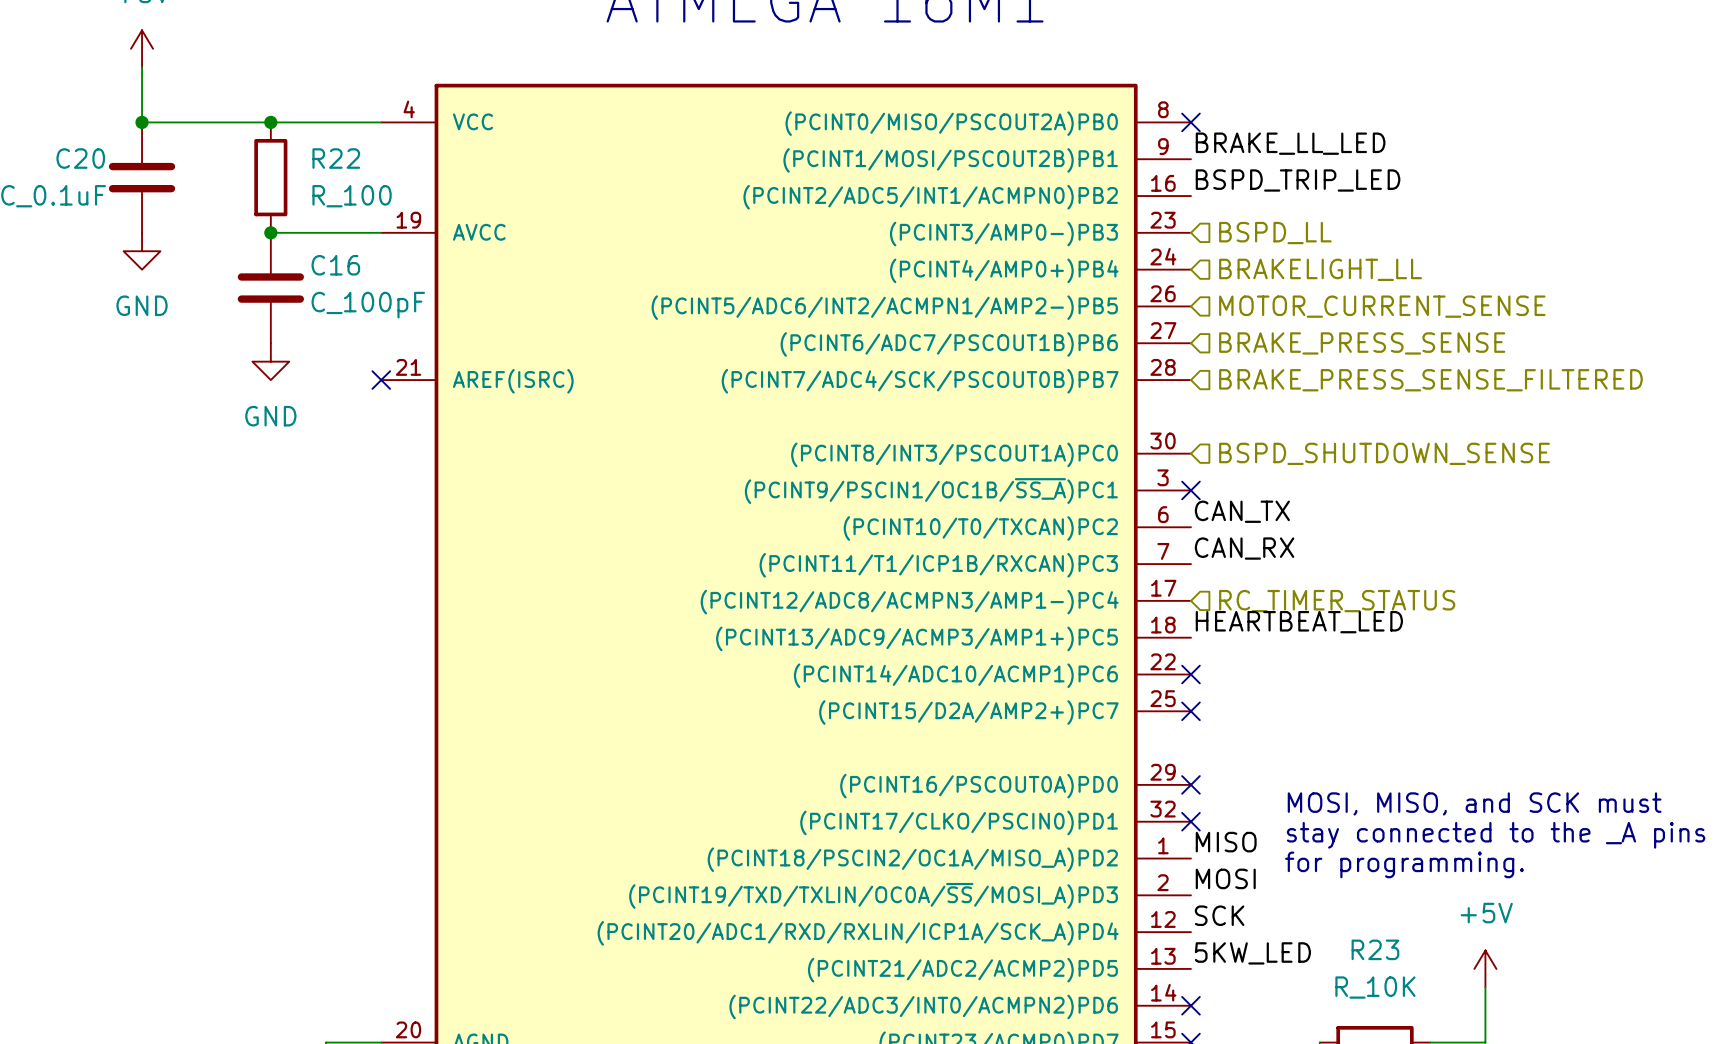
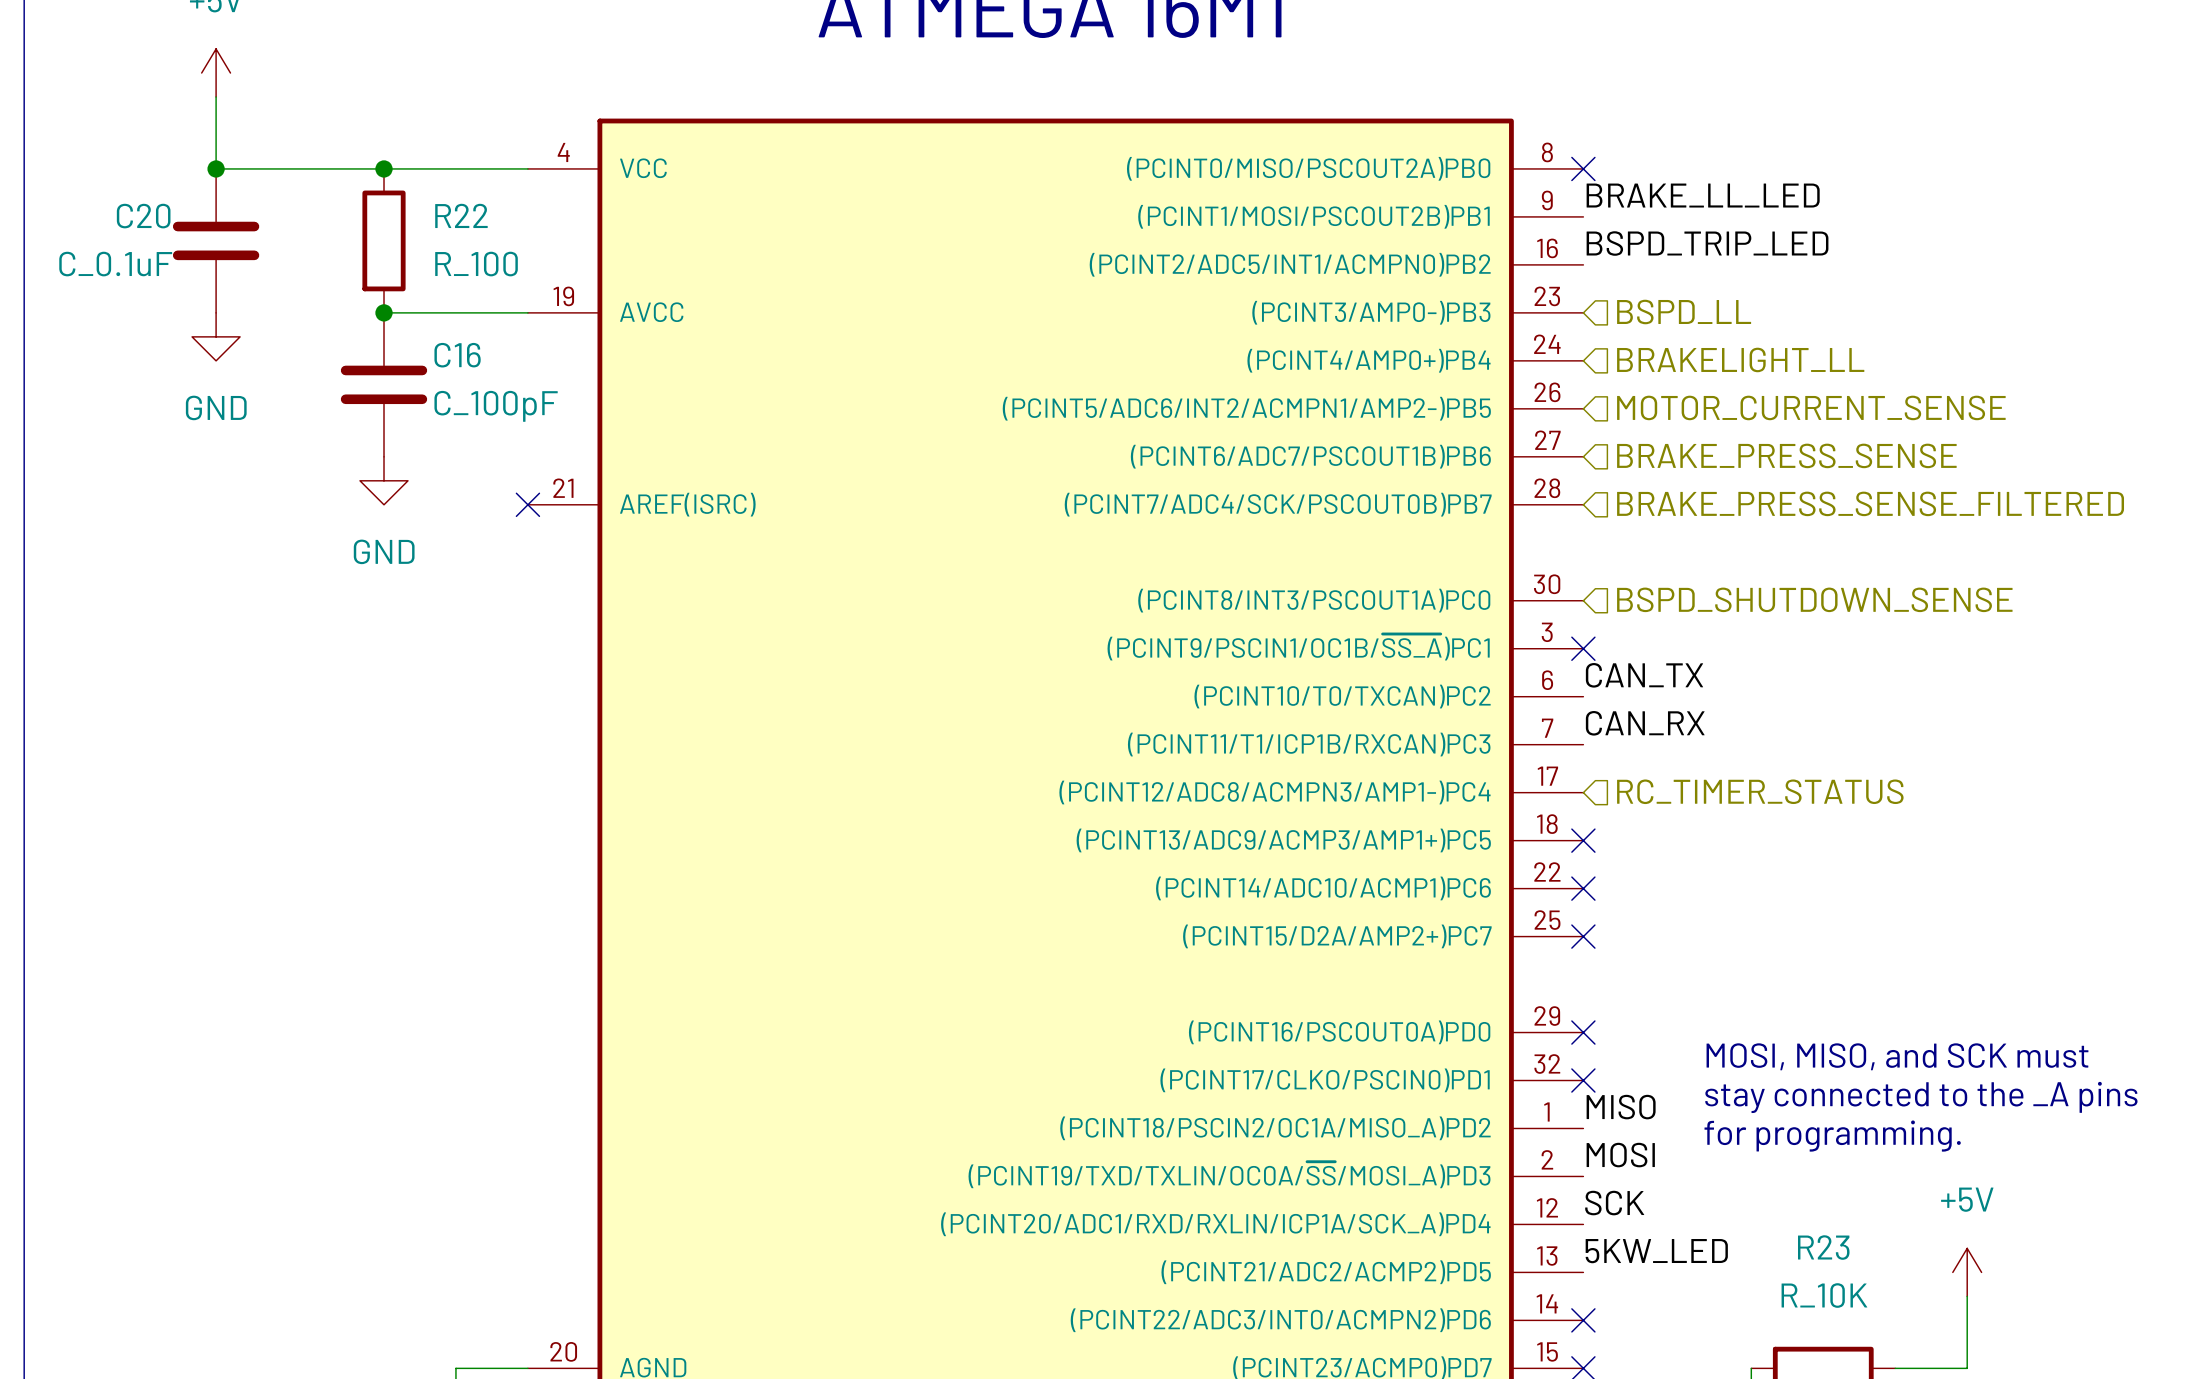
label: HEARTBEAT_LED (1299, 622) -> none
no-connect mark: none -> (1583, 840)

